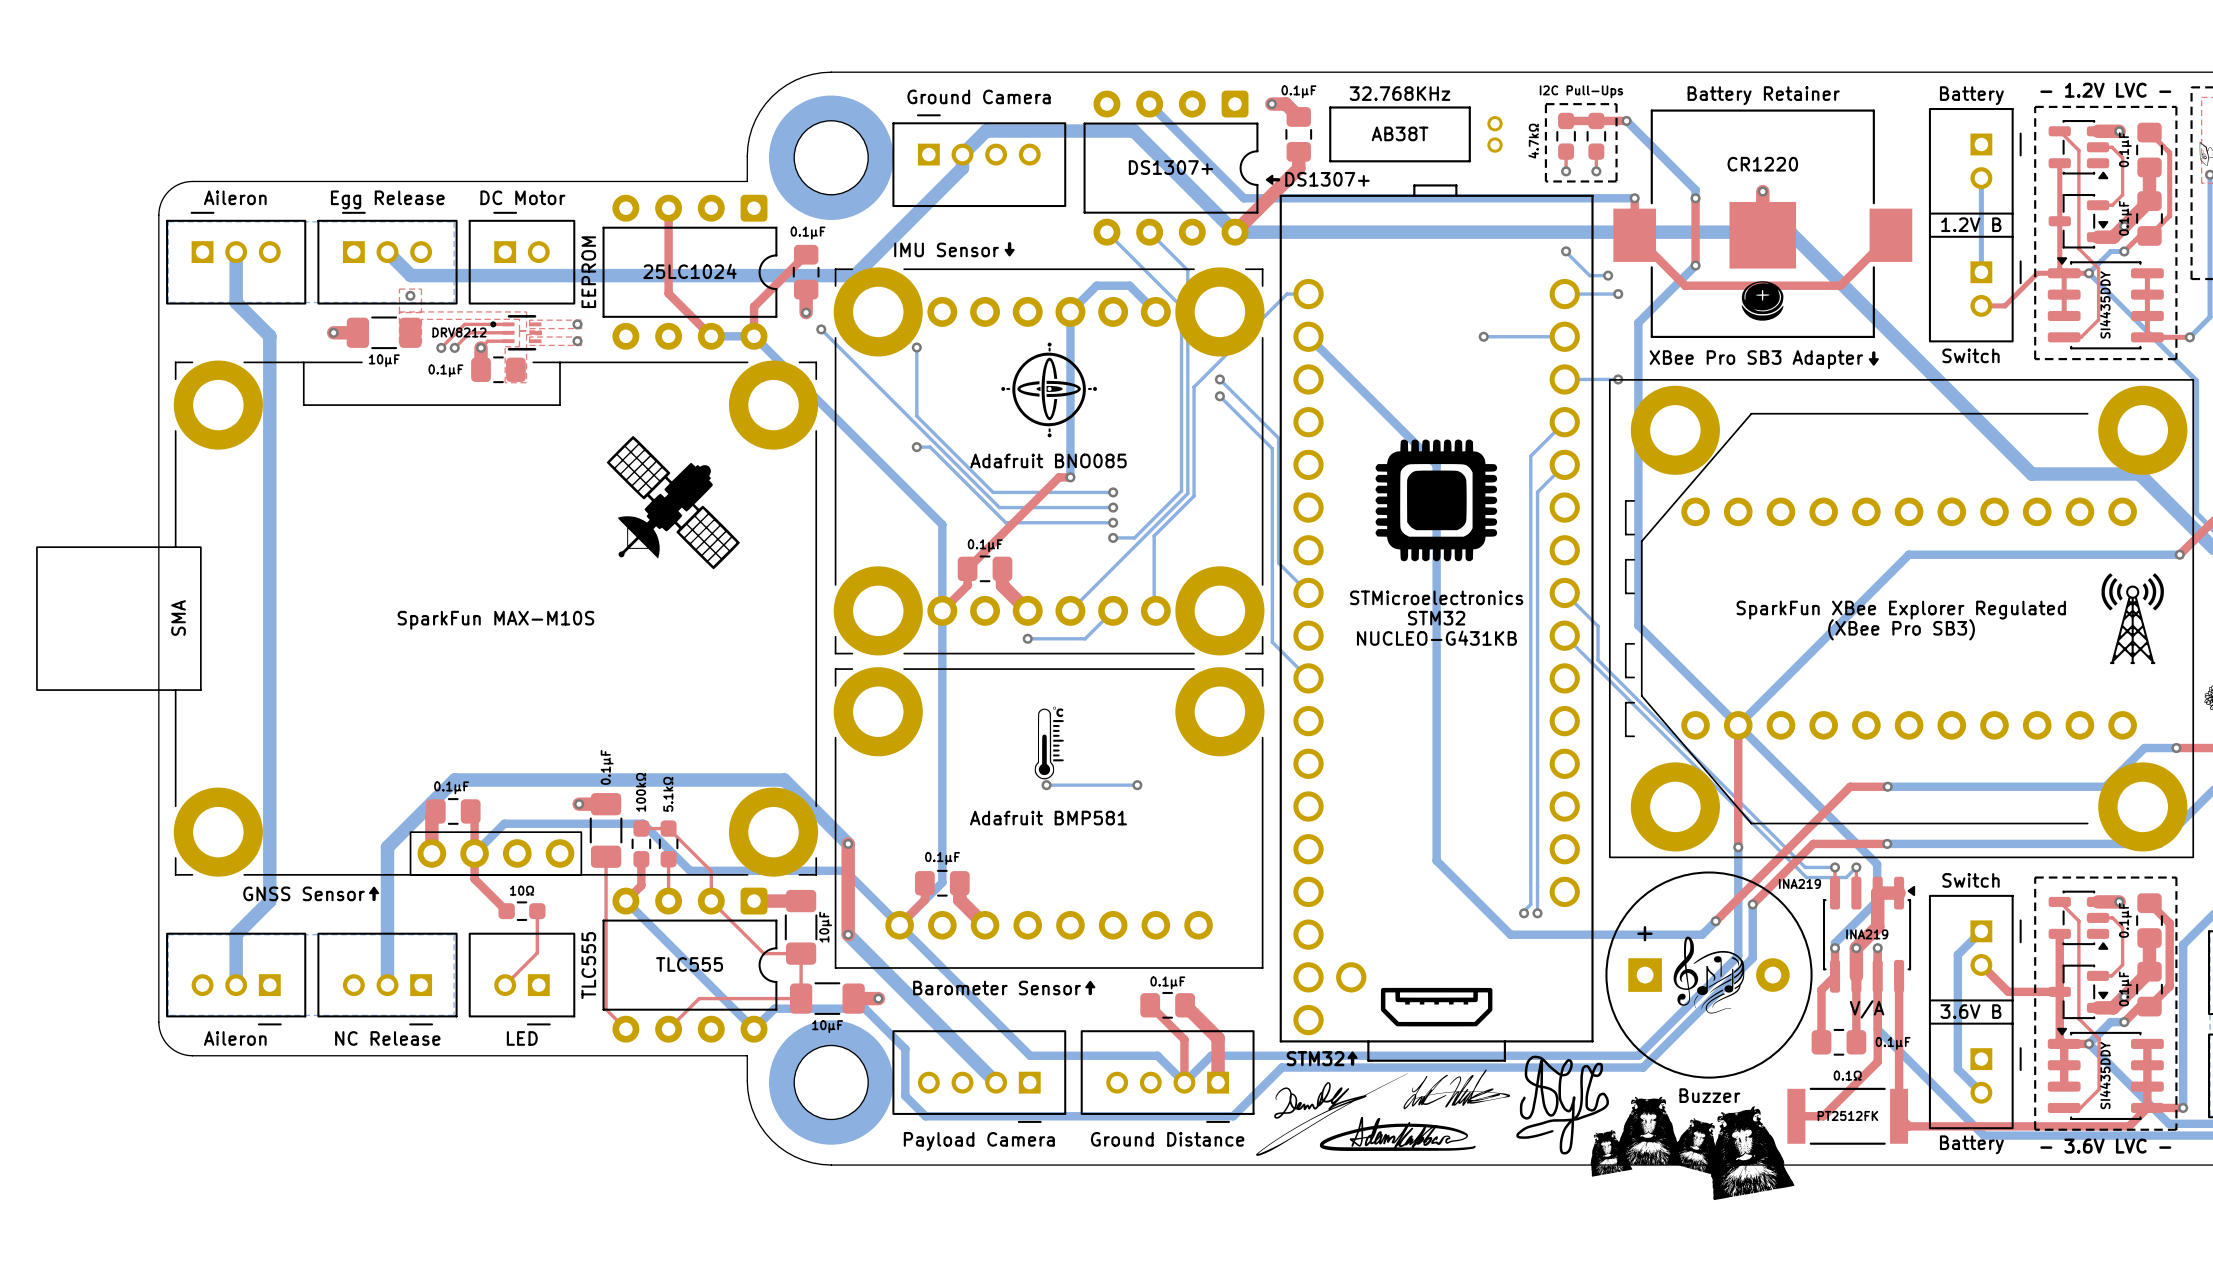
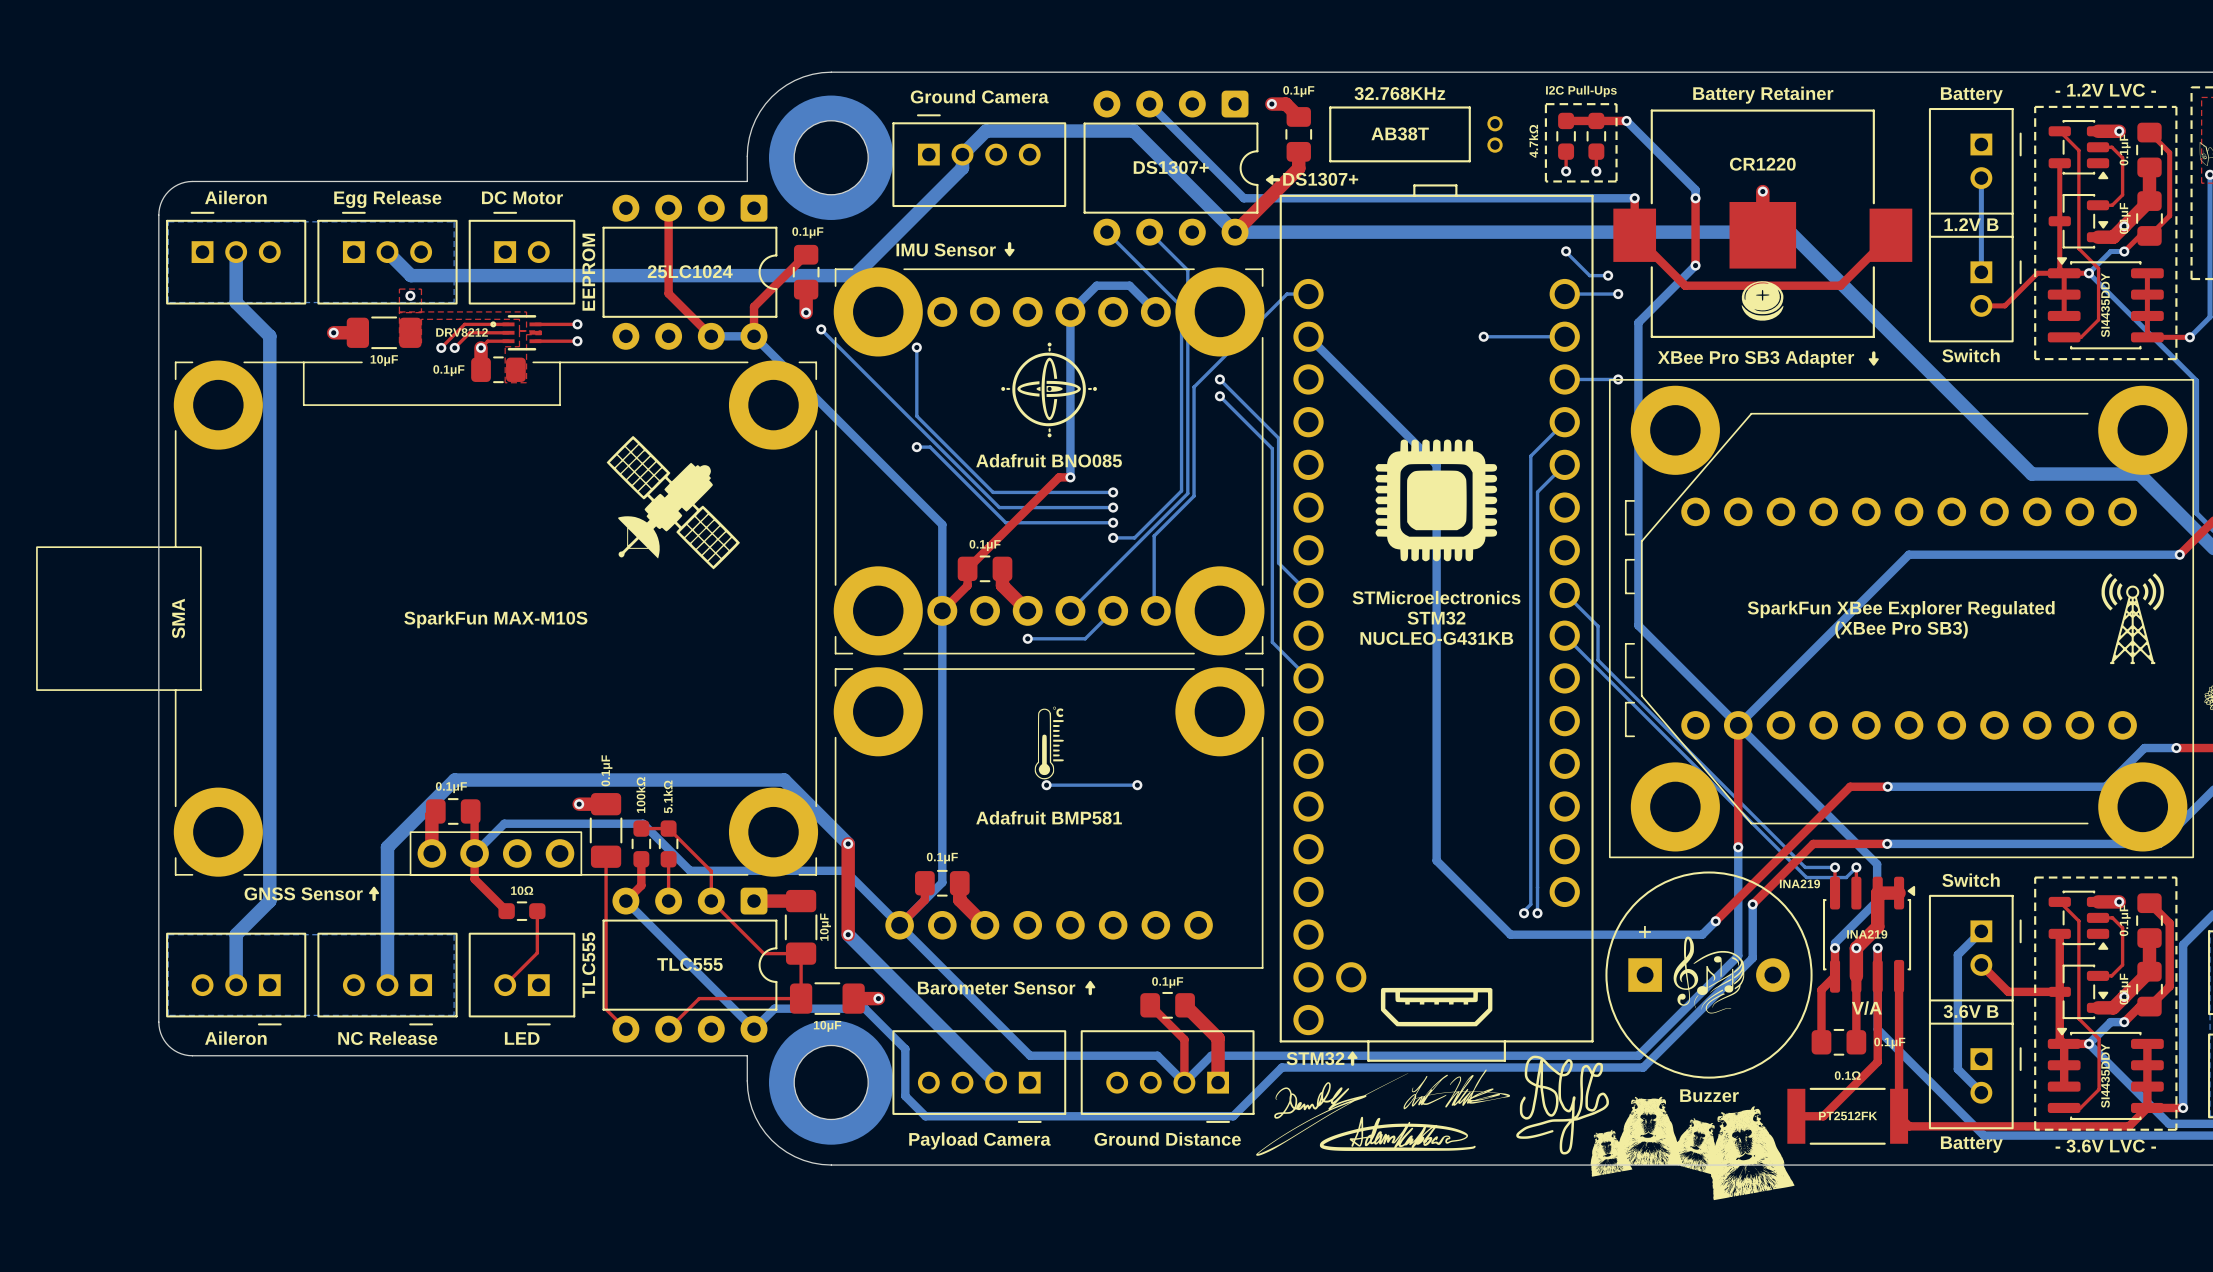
top zone outline: (529, 320) (529, 328) (581, 328) (581, 320) (529, 320) -> none
top track: none -> (535, 324) (579, 324)
top zone outline: (529, 336) (529, 345) (581, 345) (581, 336) (529, 336) -> none
top track: none -> (535, 341) (579, 341)

